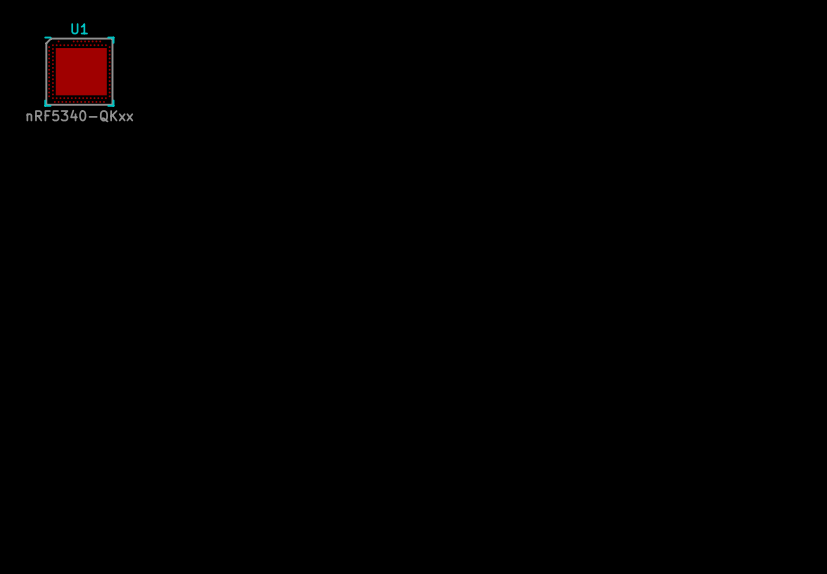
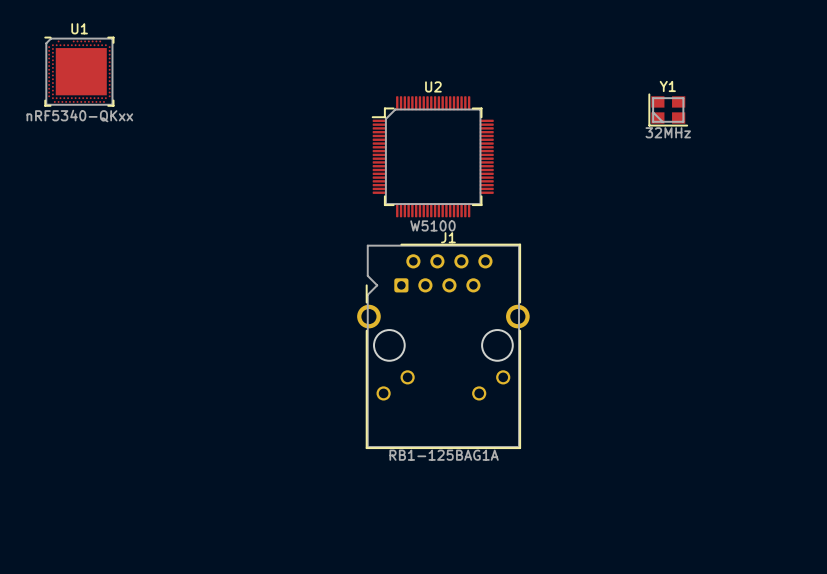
Y1: none -> 32MHz (668, 109)
U2: none -> W5100 (432, 156)
J1: none -> RB1-125BAG1A (443, 346)

